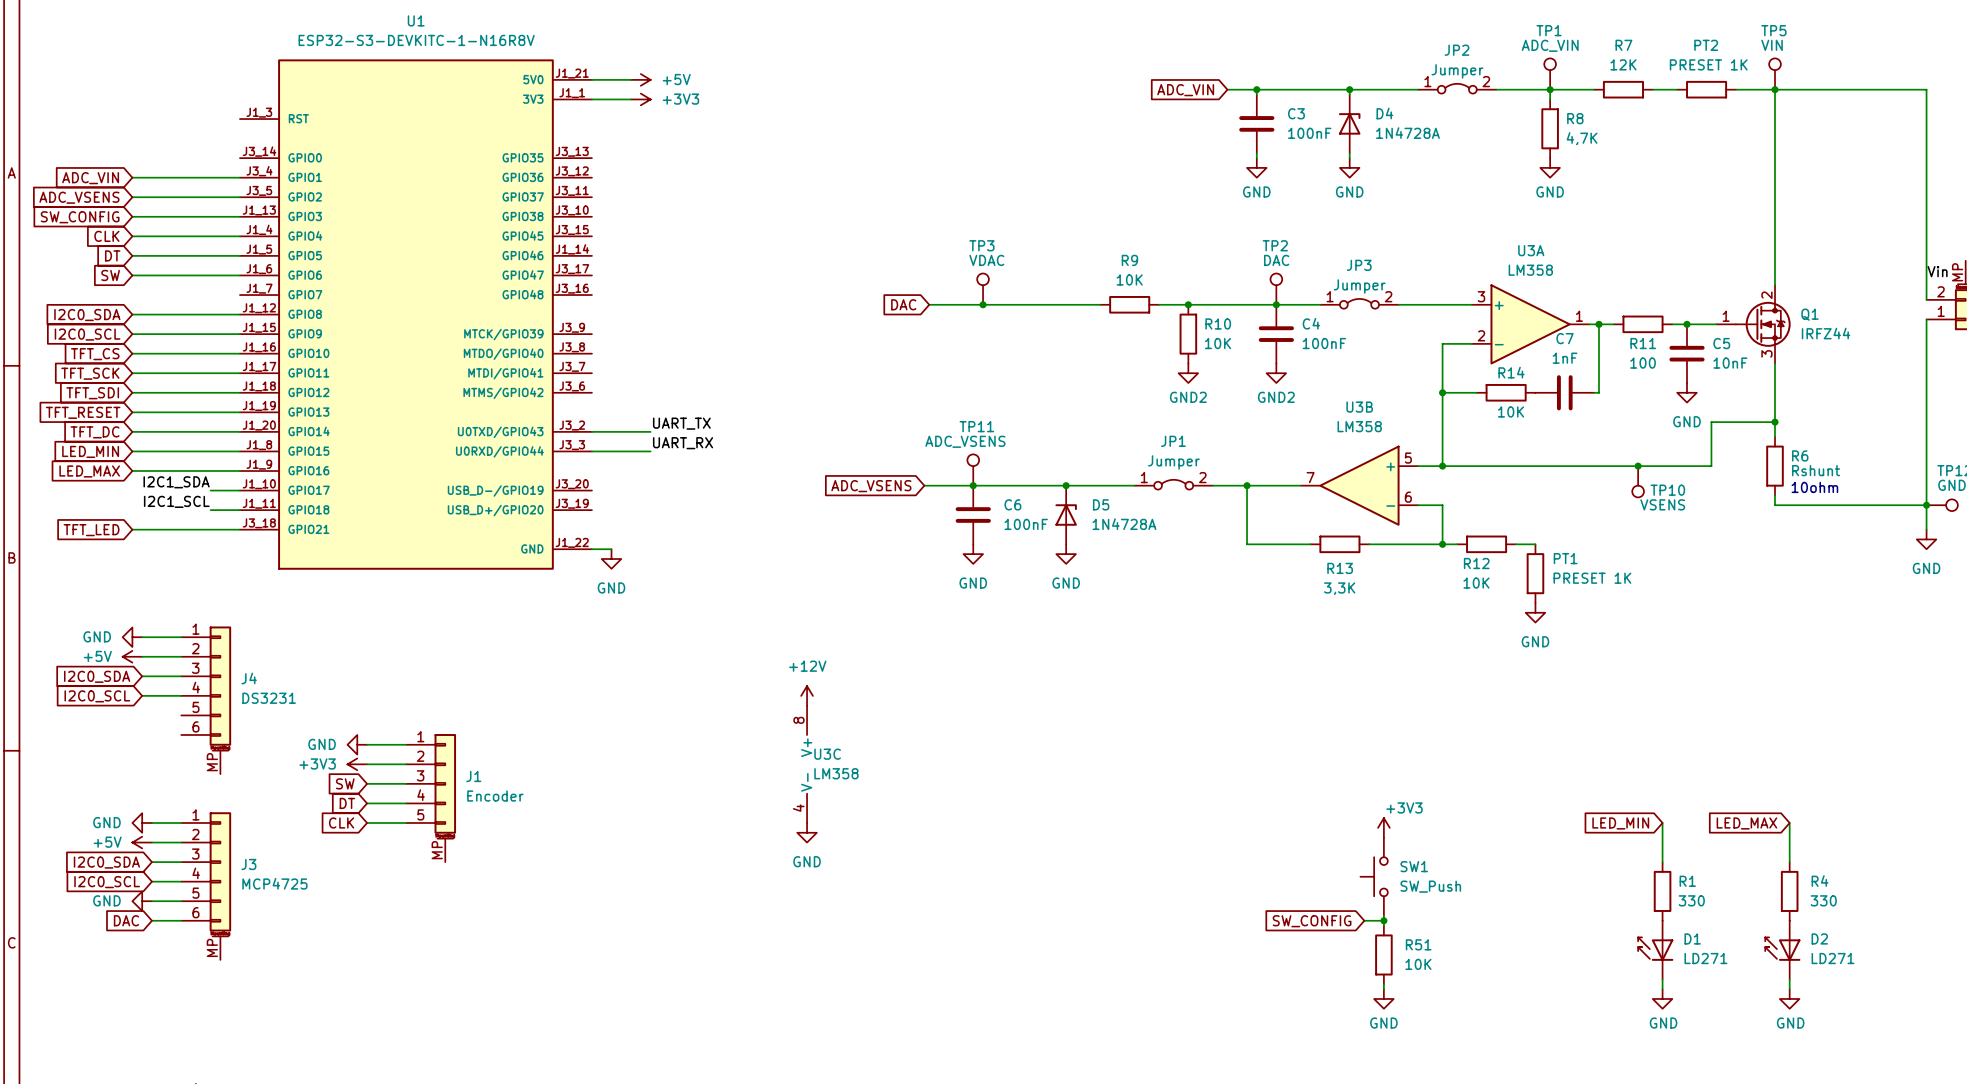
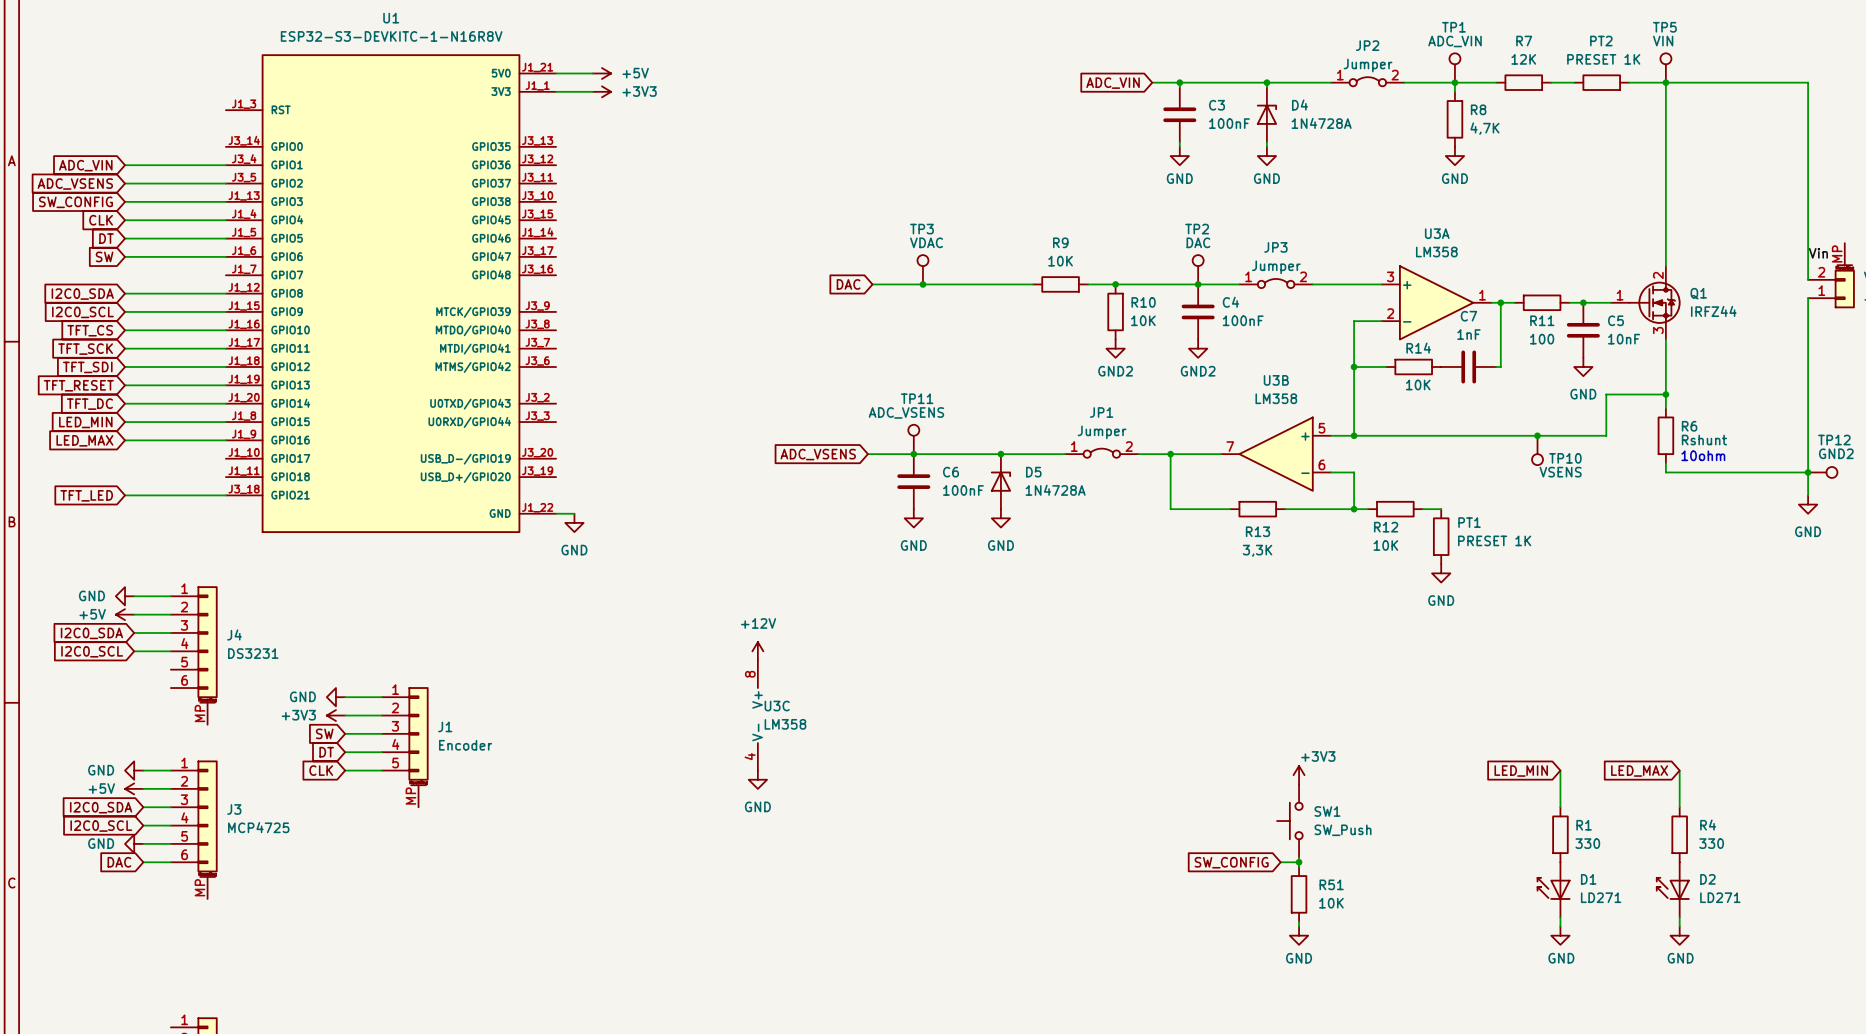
label: UART_TX (681, 423) -> none
wire: (591, 431) (650, 431) -> none
label: UART_RX (683, 443) -> none
wire: (591, 451) (650, 451) -> none
label: I2C1_SDA (176, 482) -> none
wire: (210, 490) (239, 490) -> none
label: I2C1_SCL (176, 501) -> none
wire: (210, 510) (239, 510) -> none

